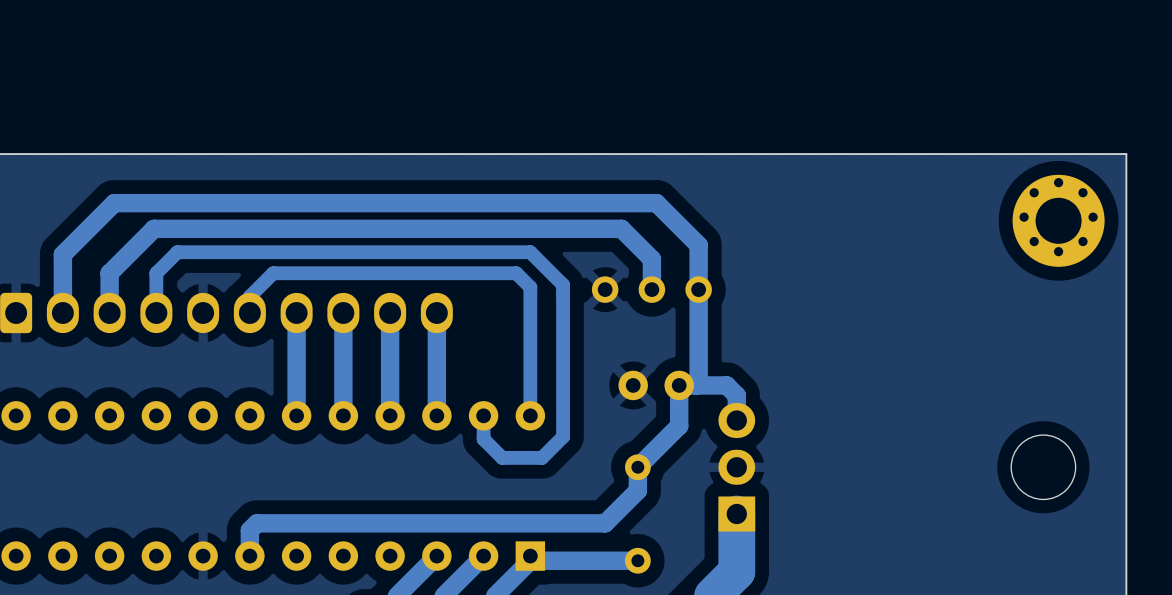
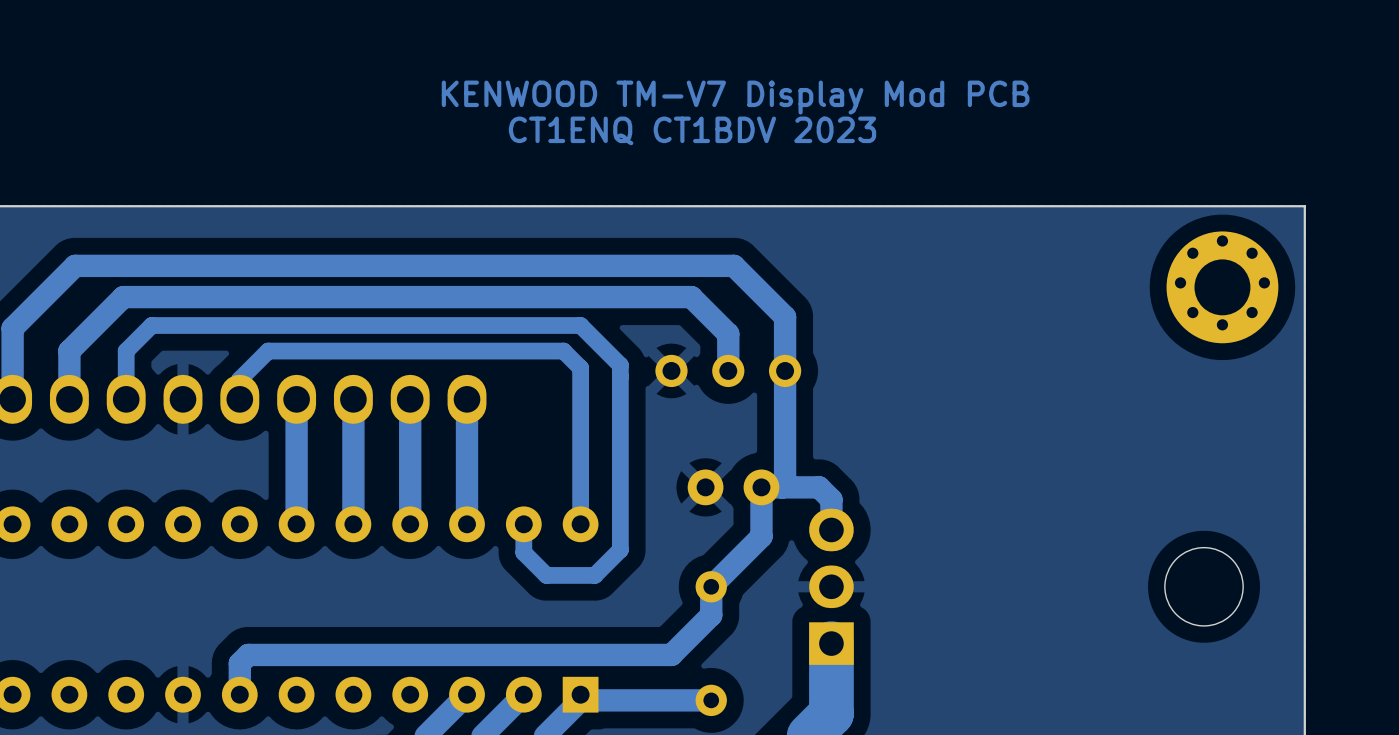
text: none -> KENWOOD TM-V7 Display Mod PCB (735, 97)
text: none -> CT1ENQ CT1BDV 2023 (692, 130)

